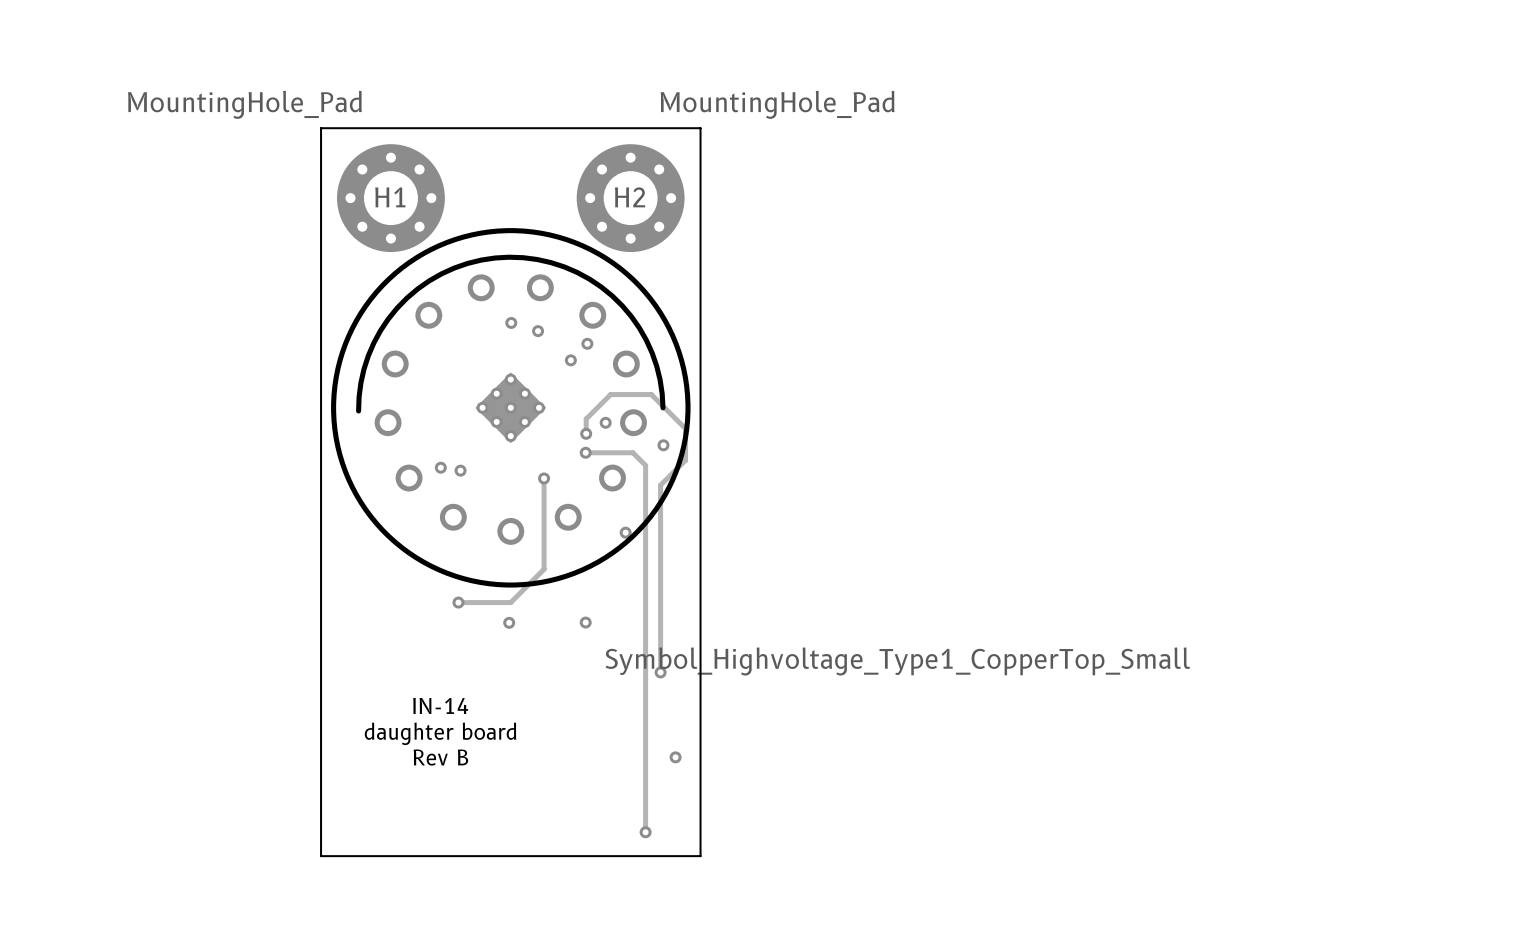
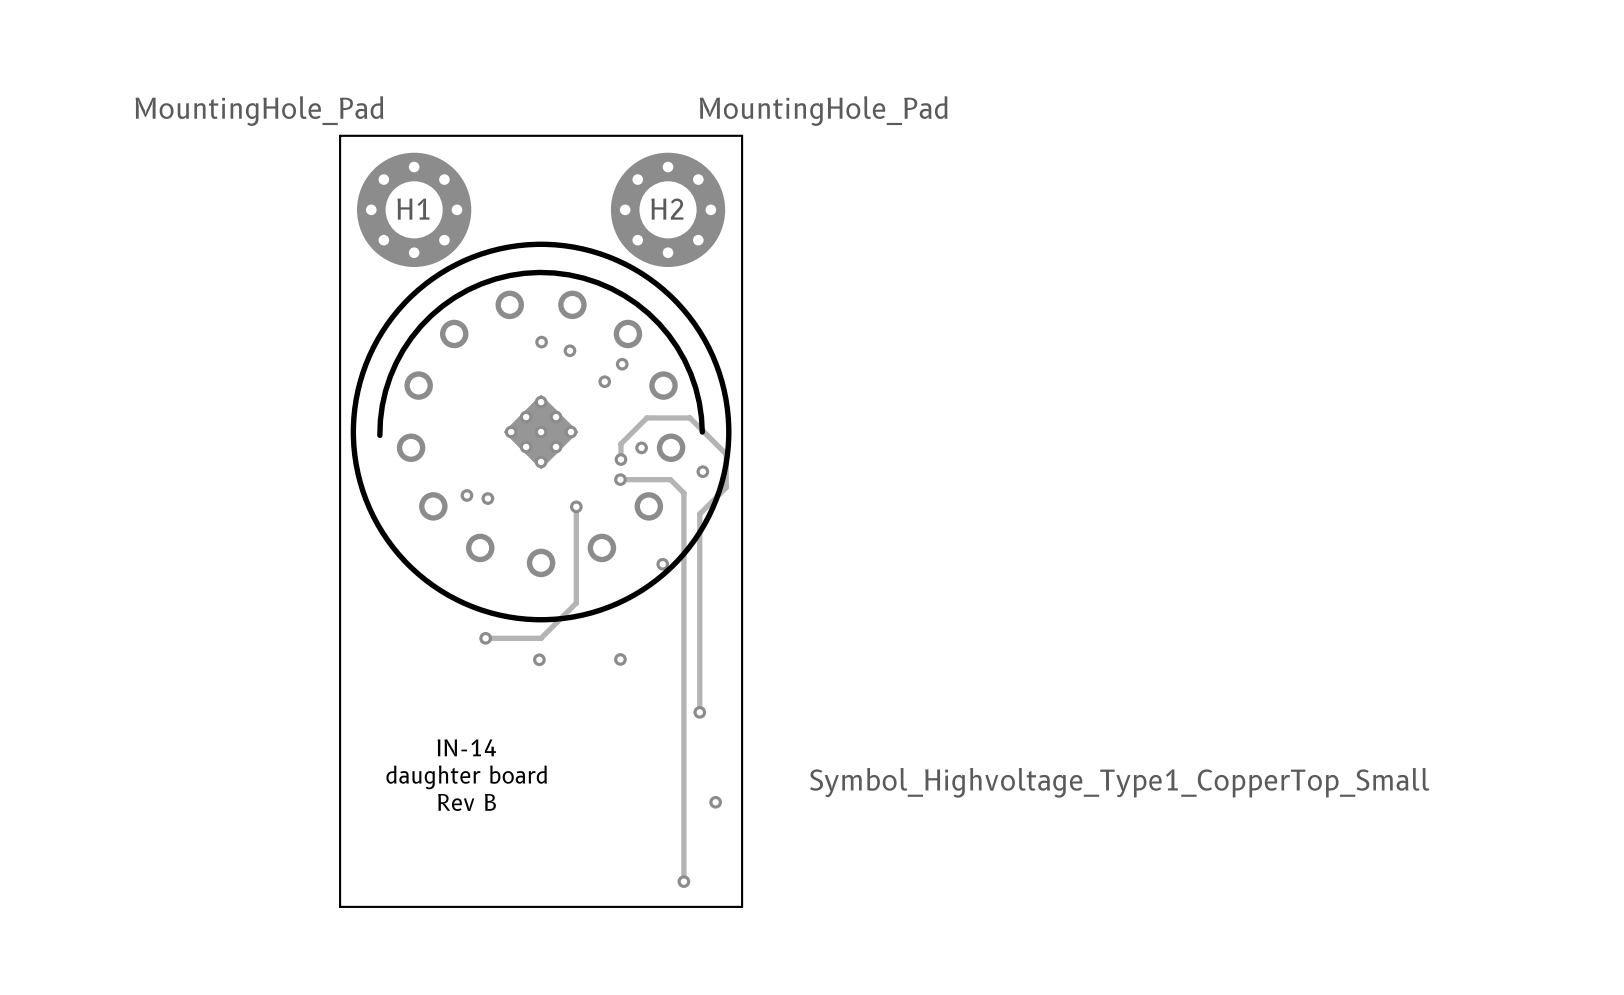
drawing position: (897, 661) -> (1119, 782)

